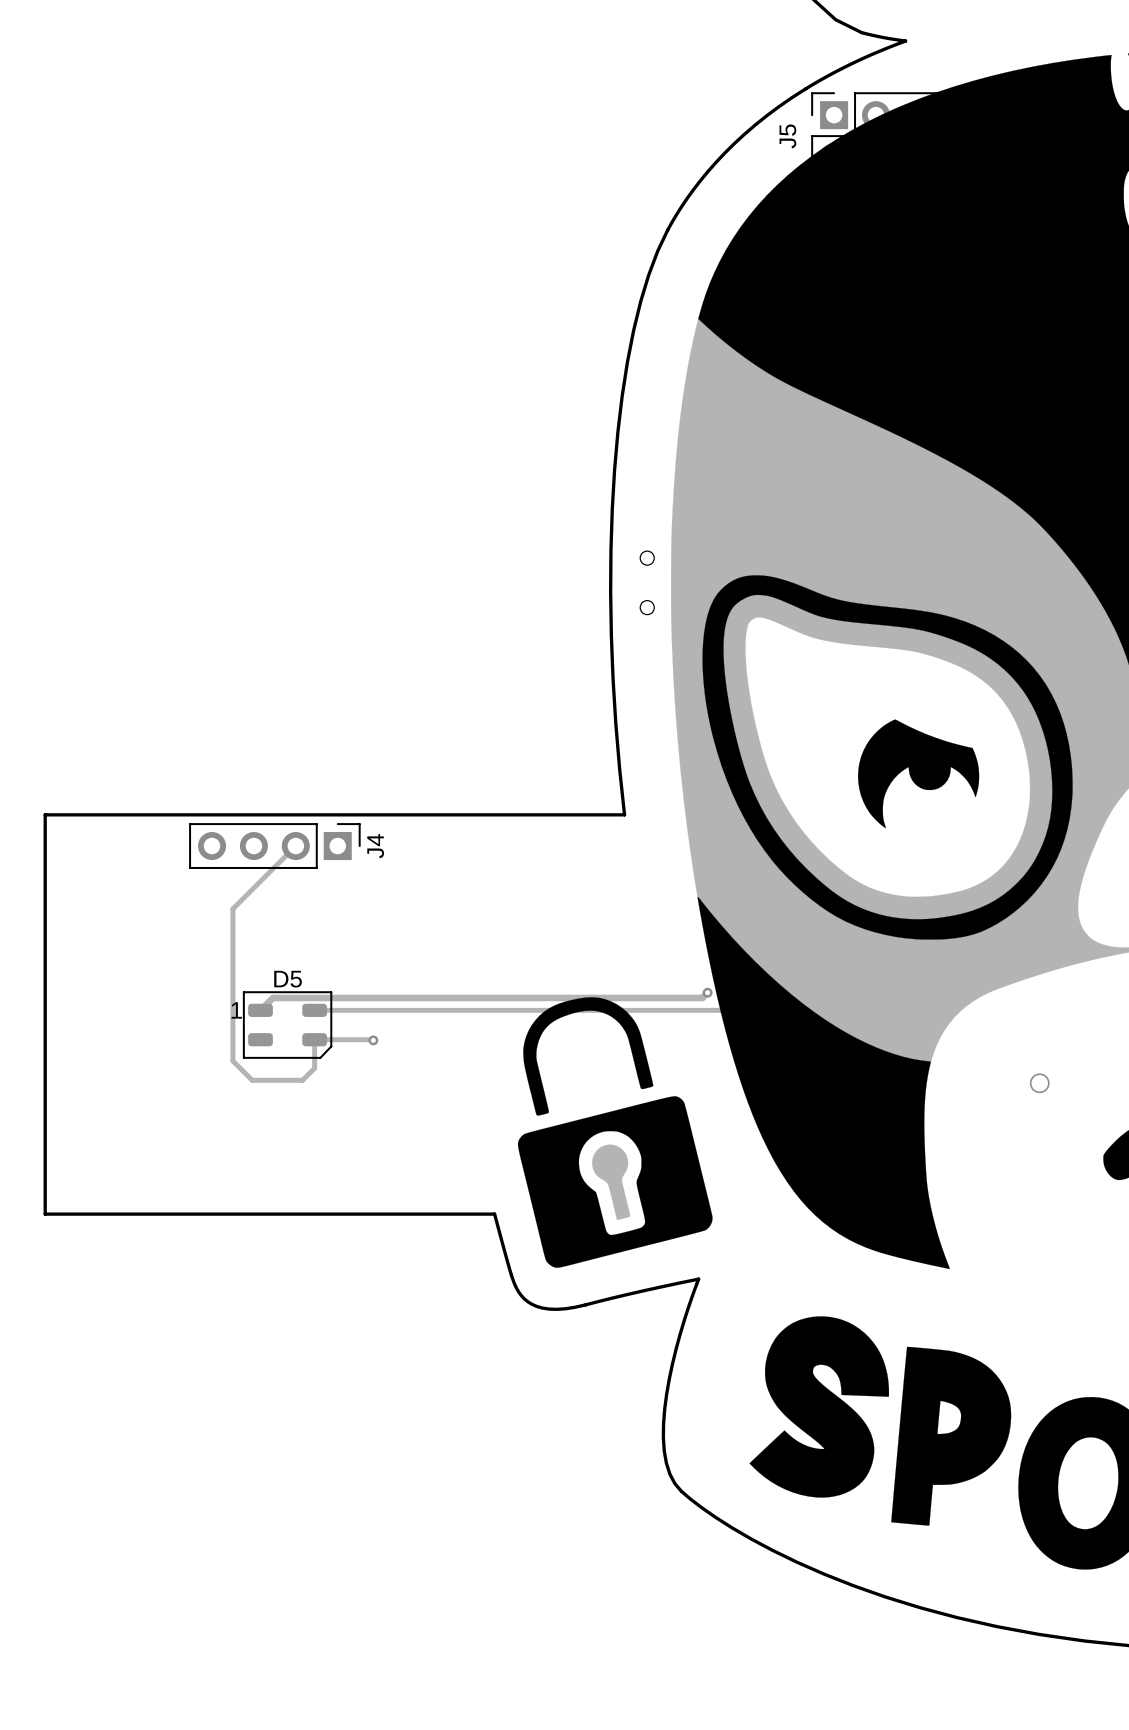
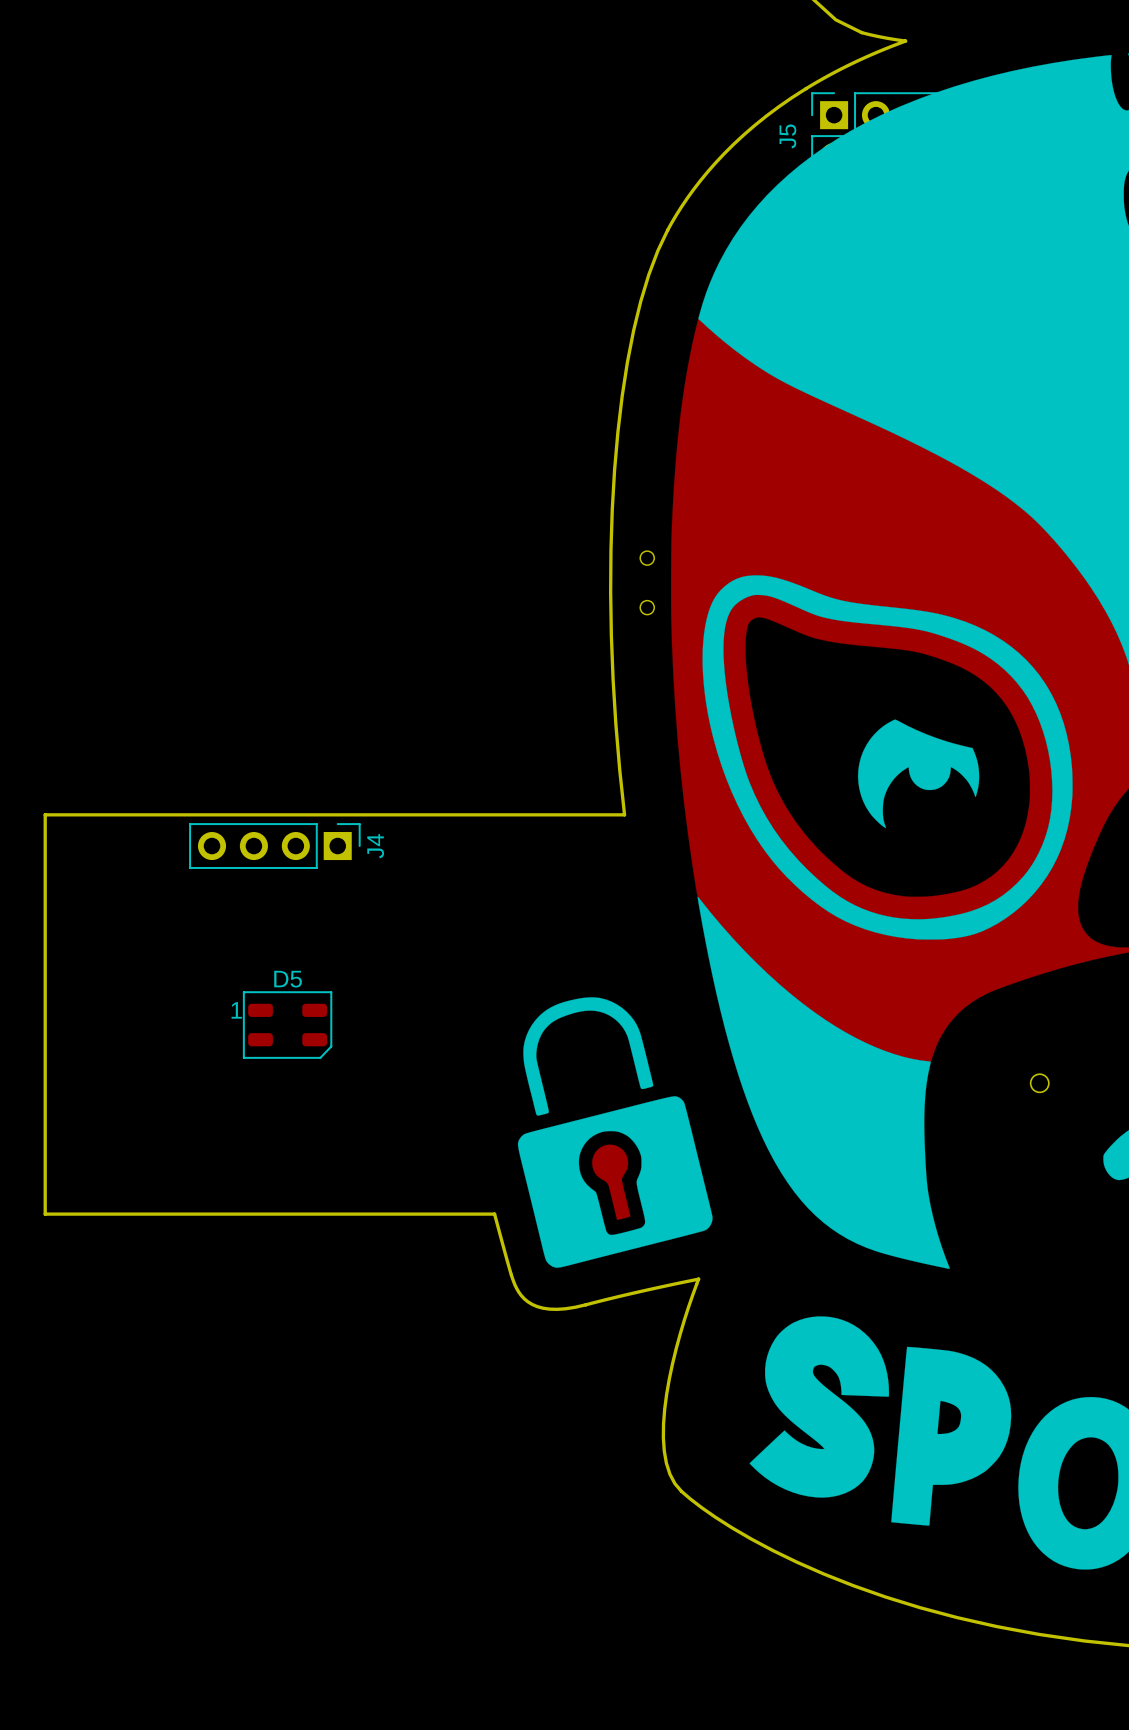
track: (295, 846) (232, 908) (232, 1061) (252, 1080) (302, 1080) (314, 1068) (314, 1039) (373, 1040) -> none
track: (707, 992) (702, 997) (272, 997) (260, 1010) -> none
via: (707, 992) -> none
track: (767, 1009) (314, 1010) -> none
via: (373, 1040) -> none

